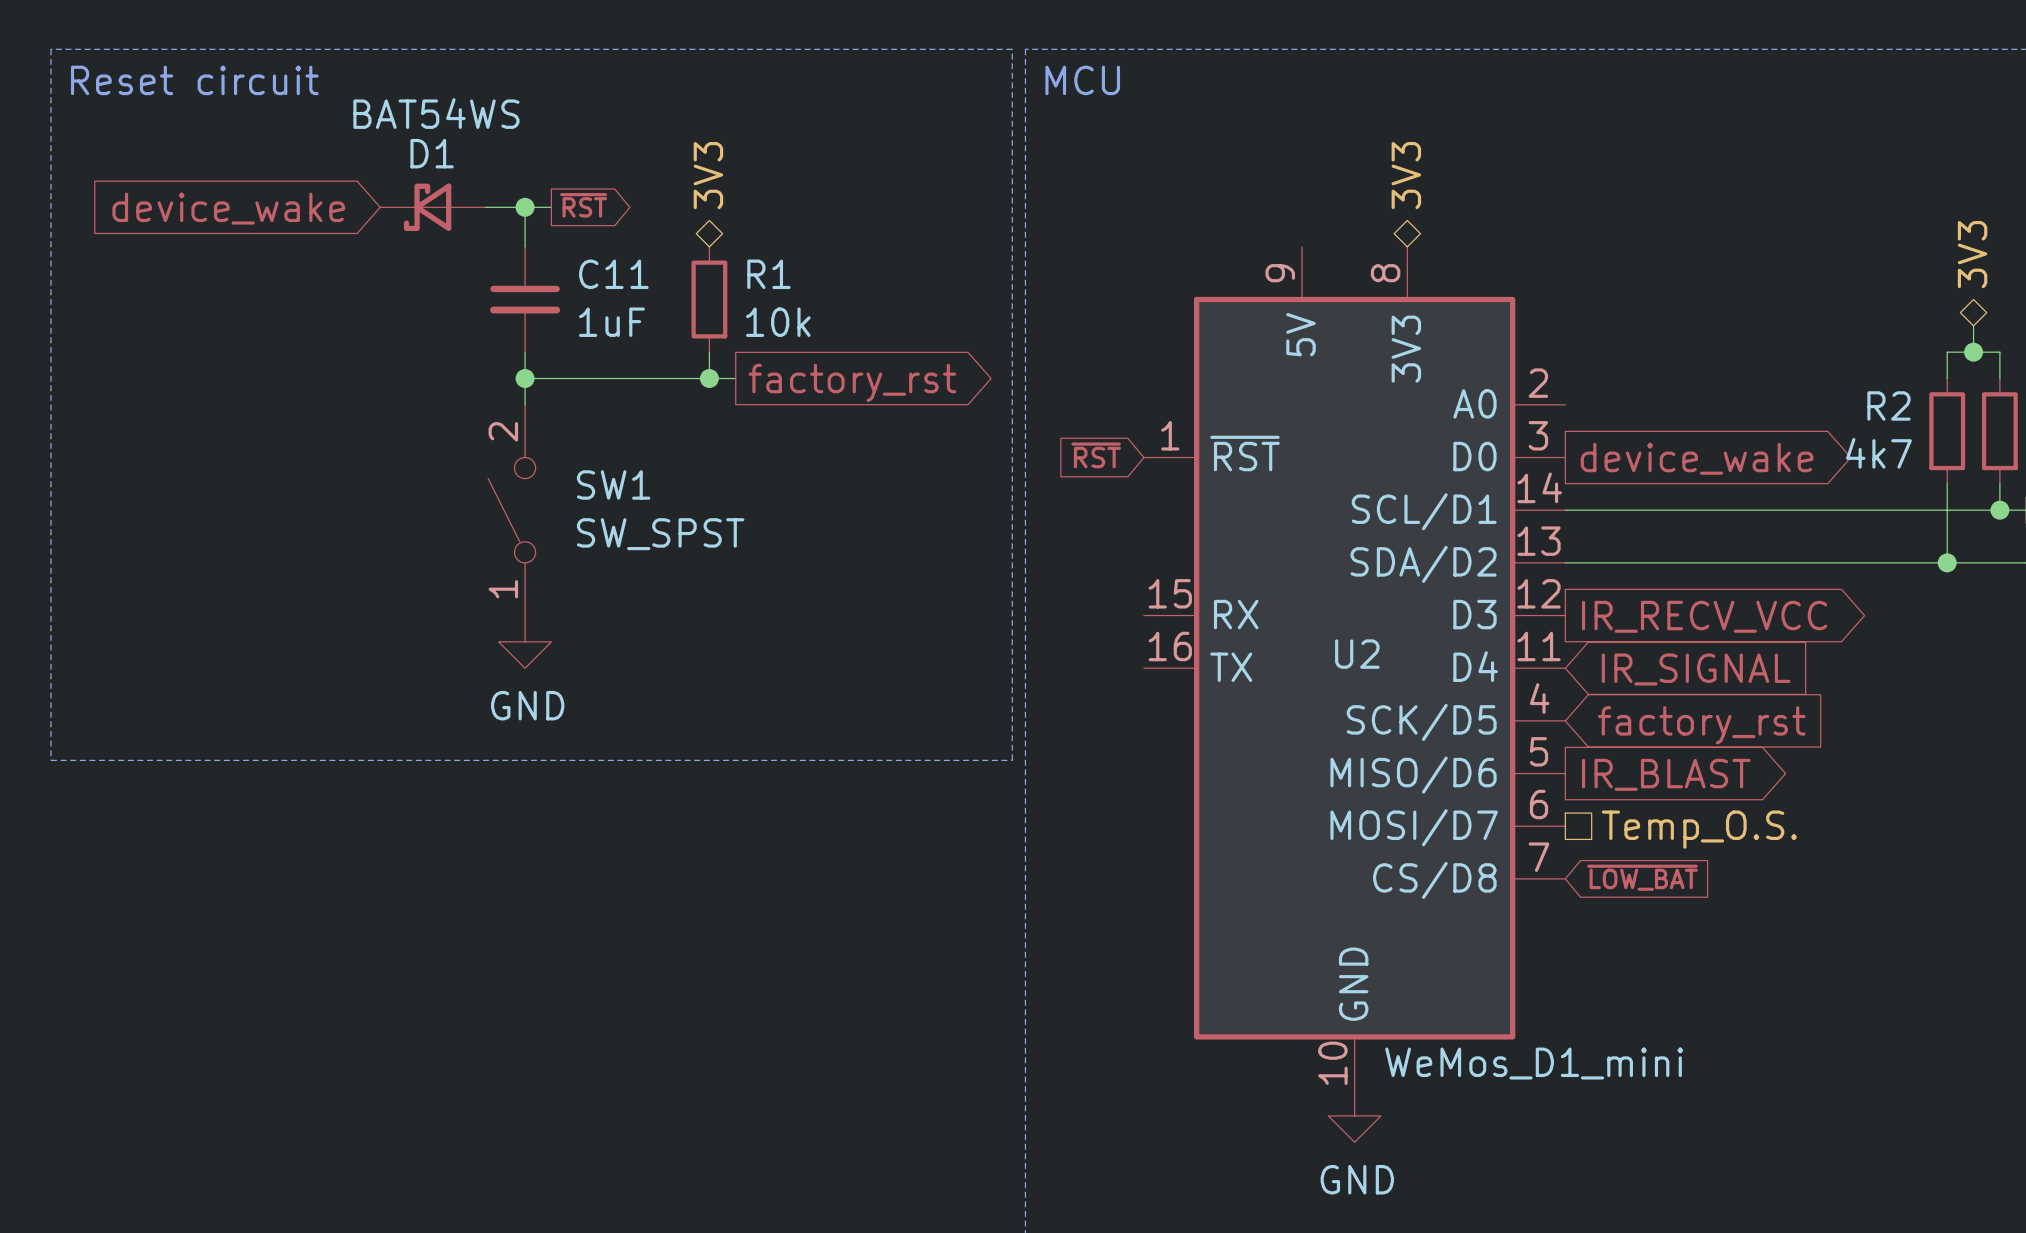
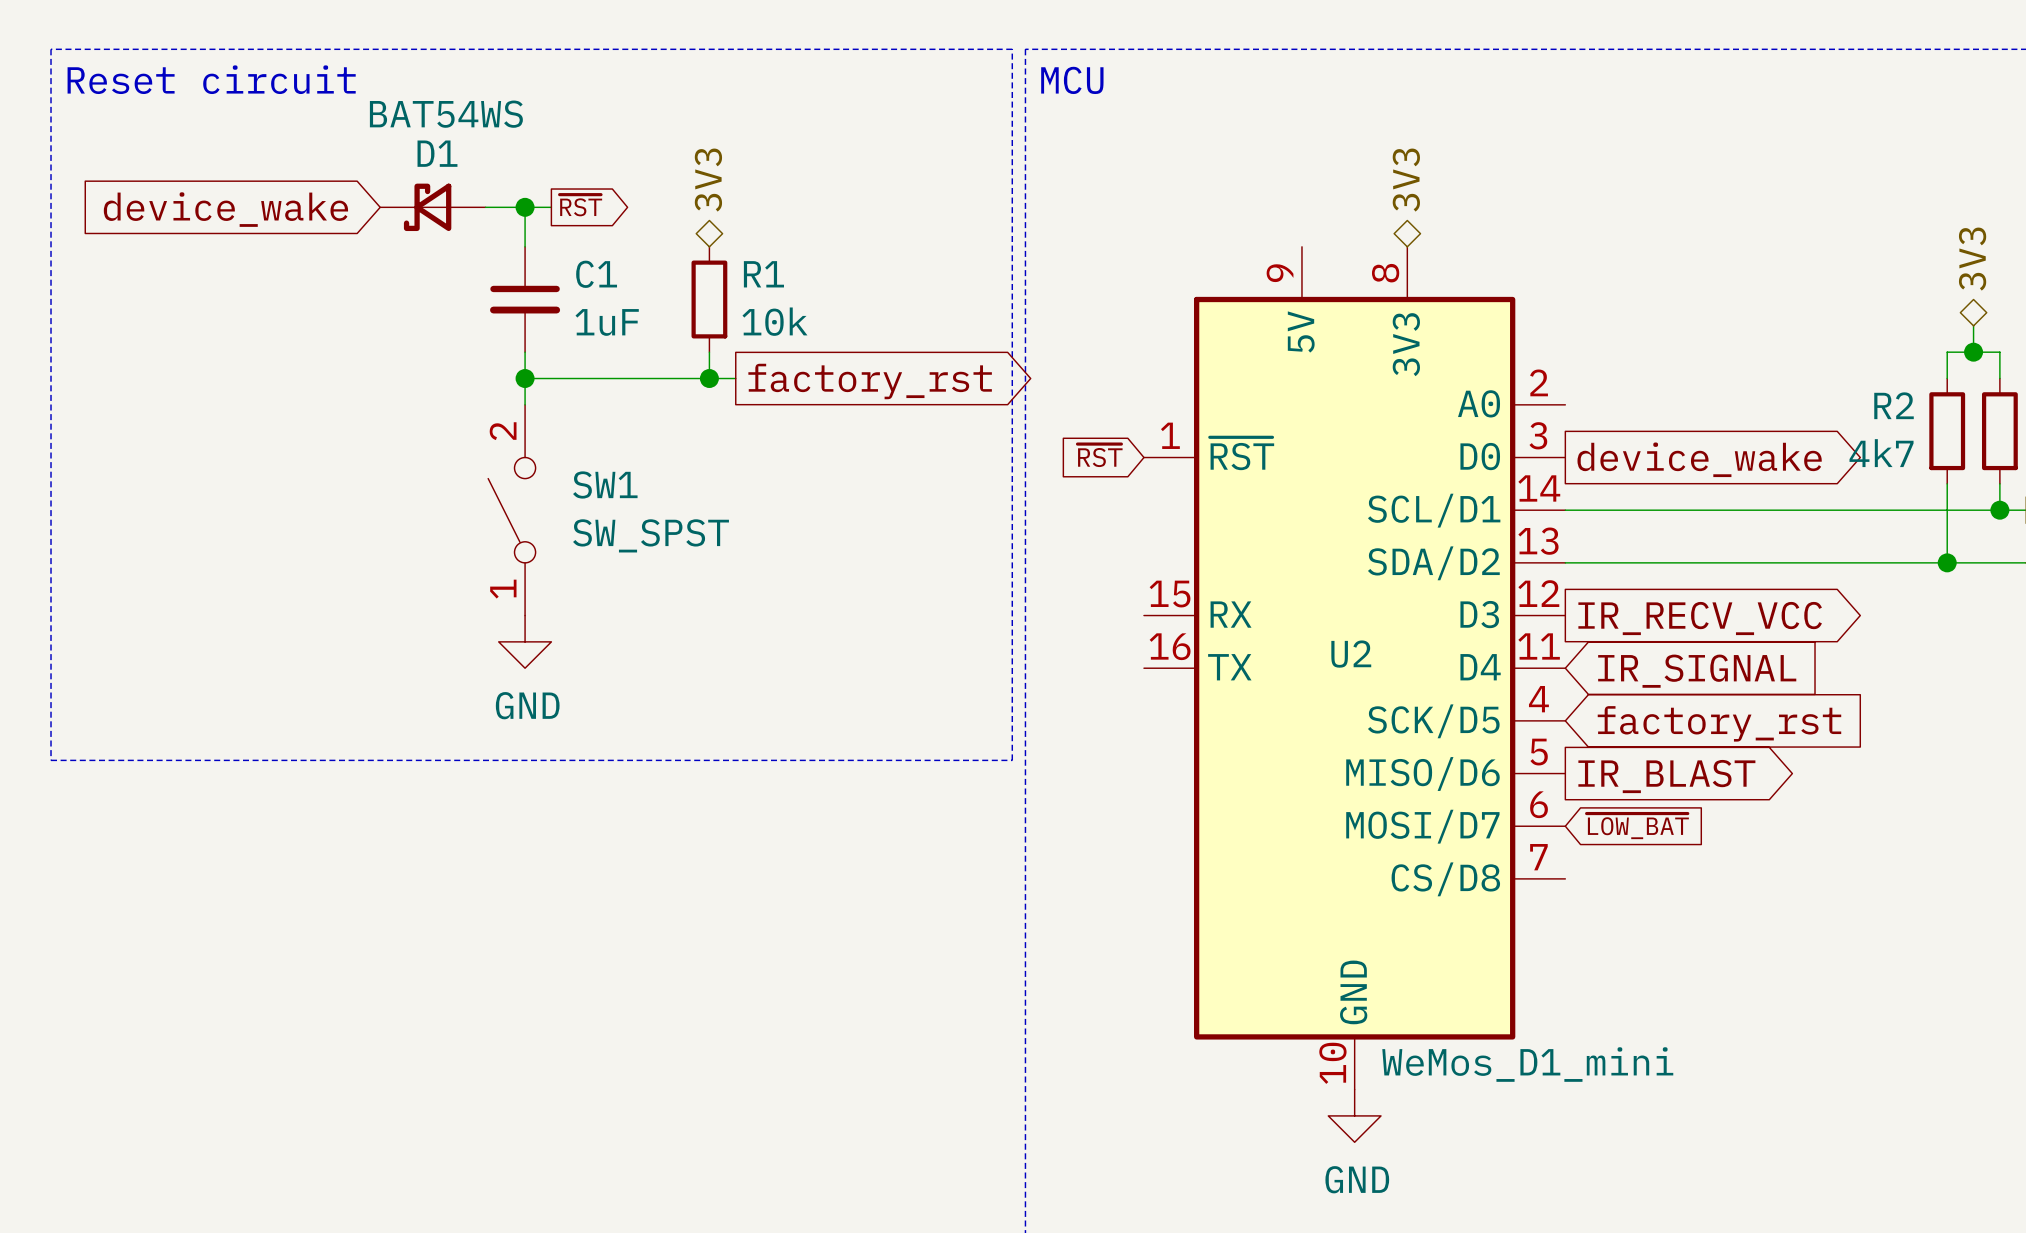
C11 name: C11 (613, 274) -> C1 (596, 274)
hierarchical label: Temp_O.S. (1699, 829) -> none
global label position: ~{LOW_BAT} (1642, 877) -> ~{LOW_BAT} (1637, 826)

